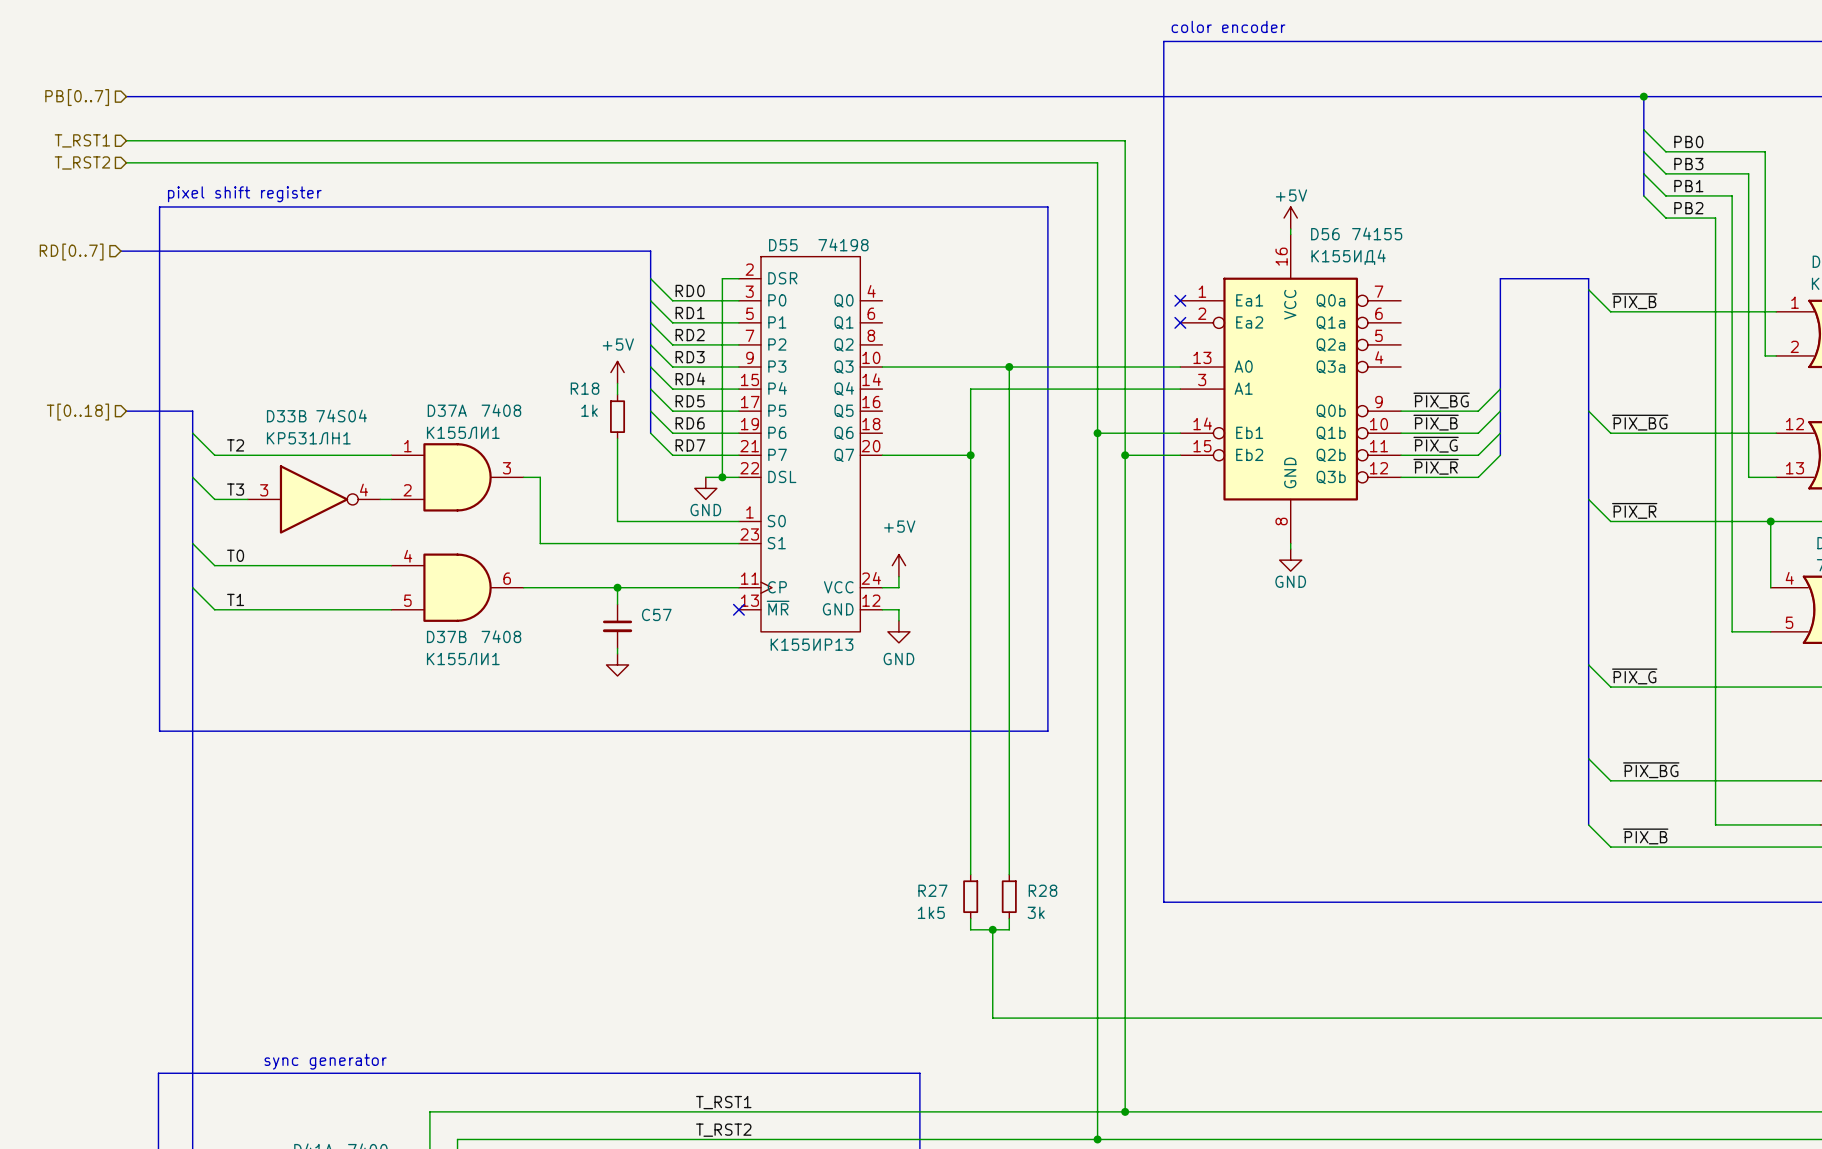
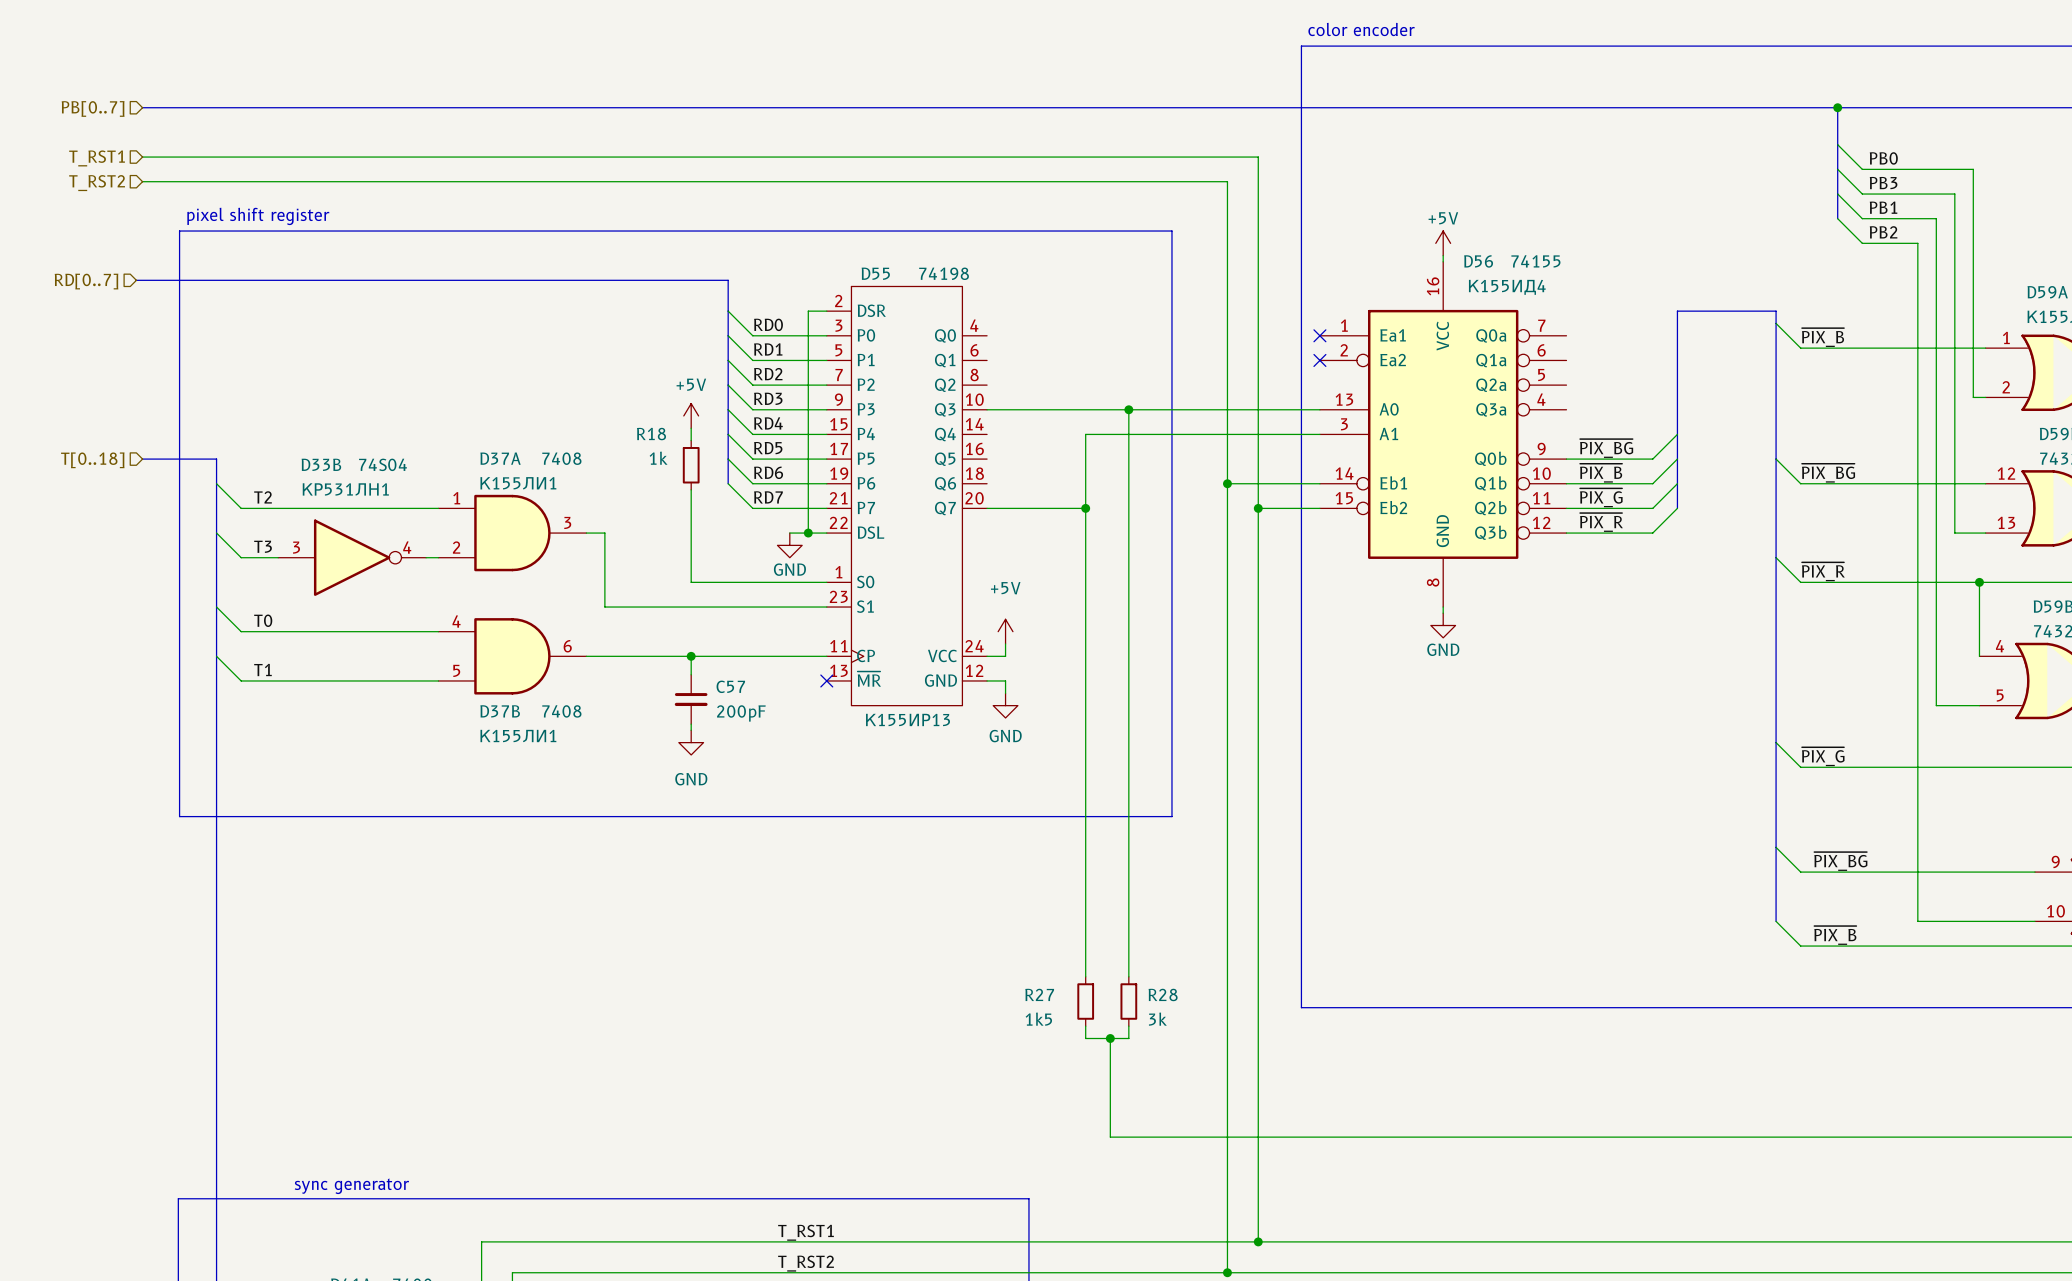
C57 value: none -> 200pF (741, 713)
power symbol text: none -> GND (691, 779)

